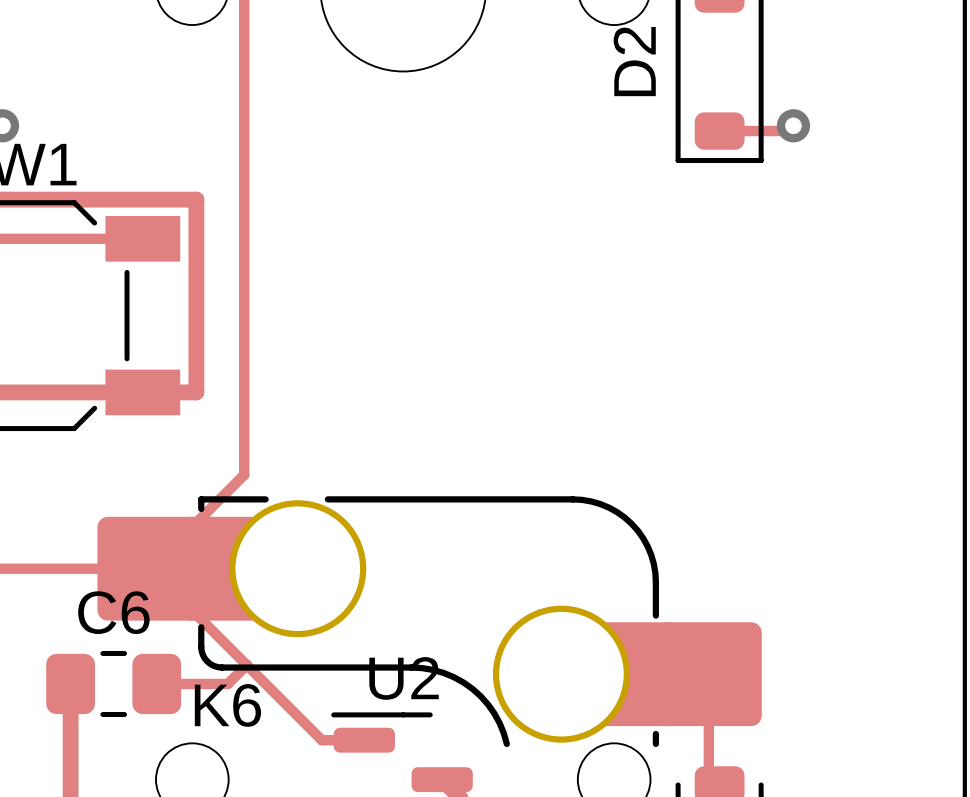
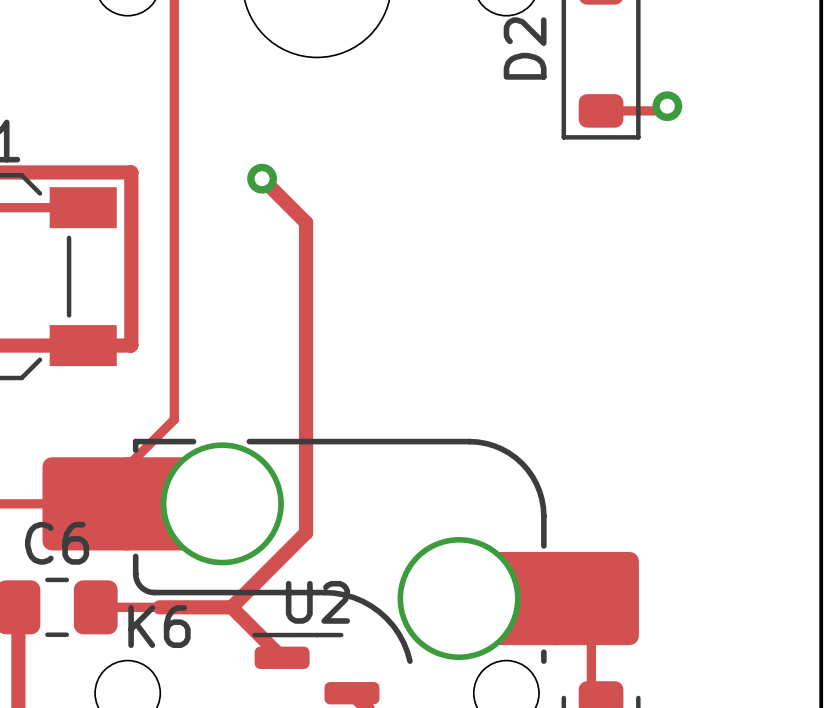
track: none -> (262, 178) (306, 222) (306, 532) (231, 607)
via: none -> (262, 178)
track: (150, 568) (321, 740) (364, 740) -> (231, 607) (282, 657)
track: (246, 665) (227, 683) -> (231, 607) (159, 607)

